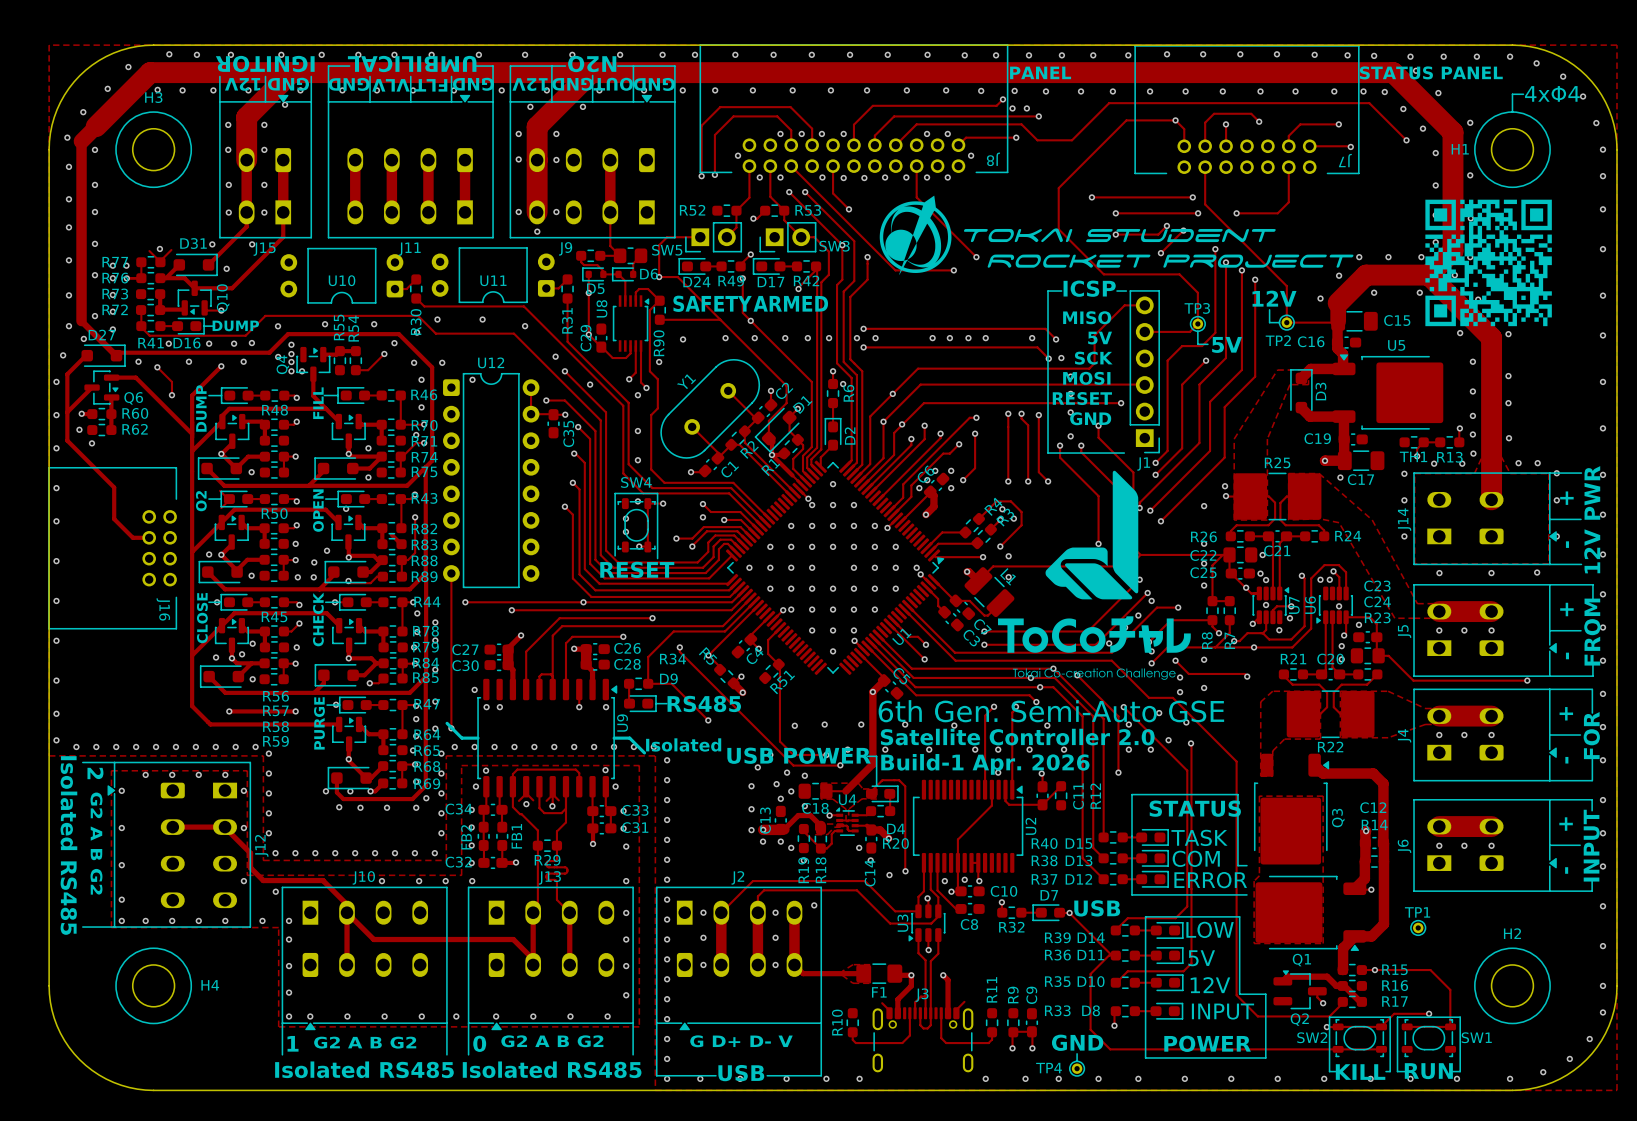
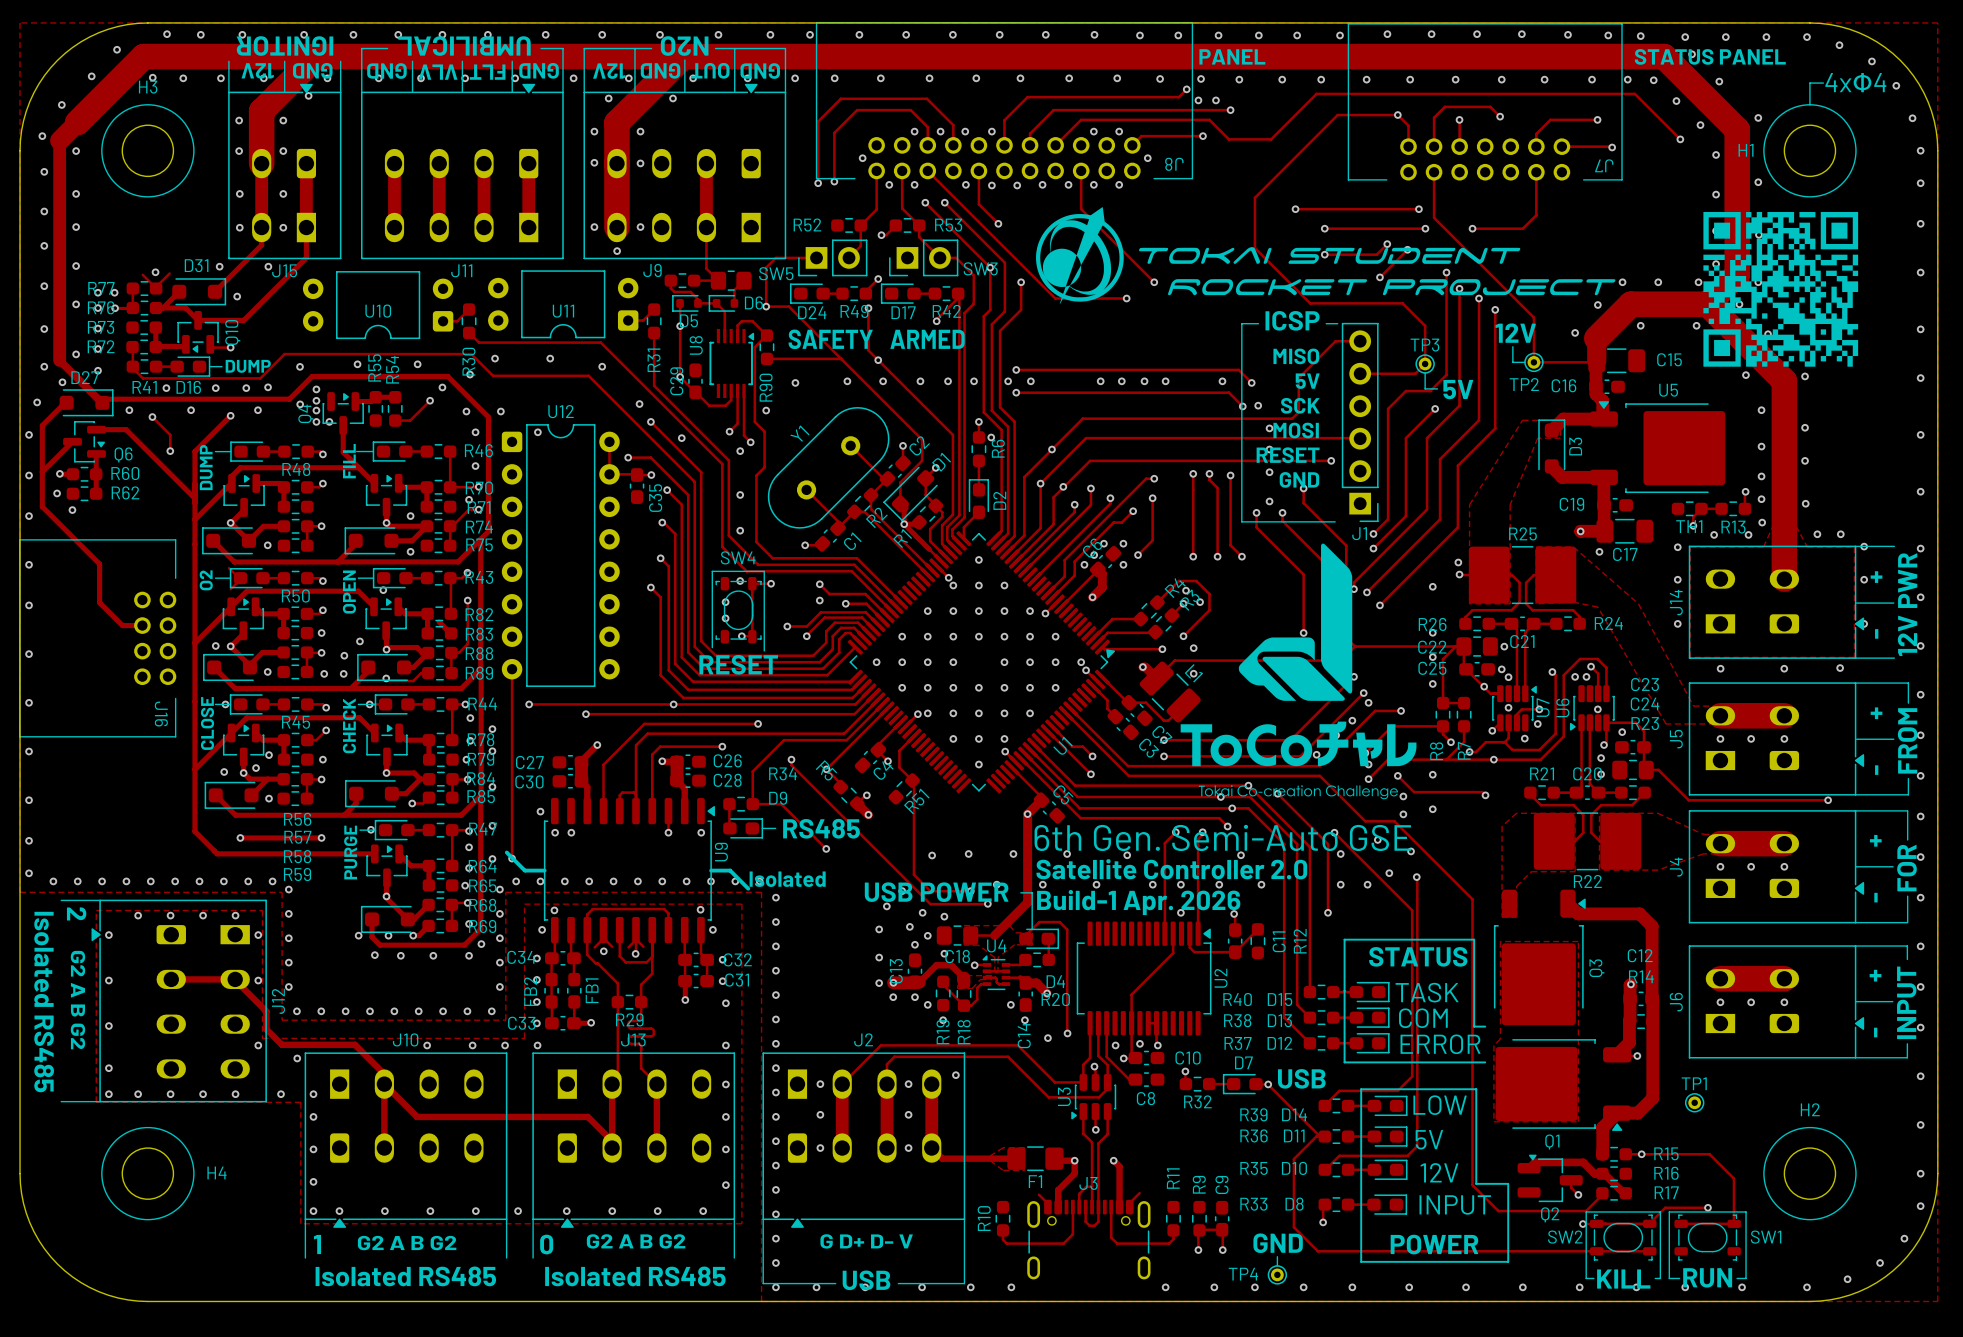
C33 name: C33 (635, 810) -> C32 (737, 959)
C32 name: C32 (458, 862) -> C33 (521, 1023)

